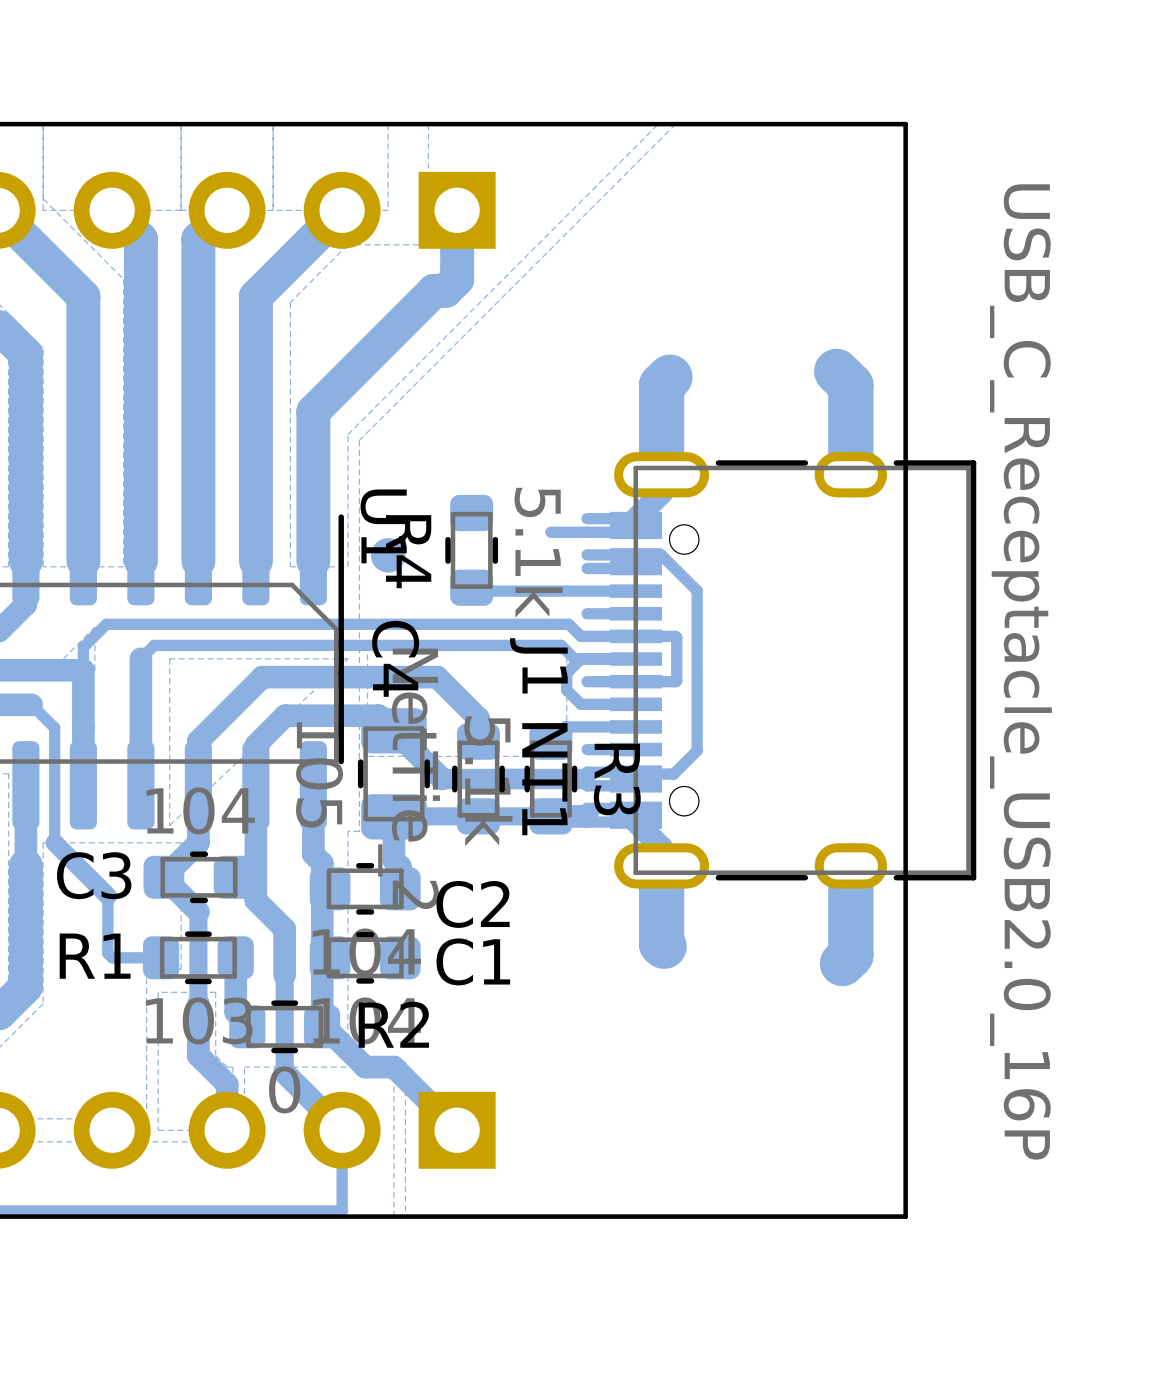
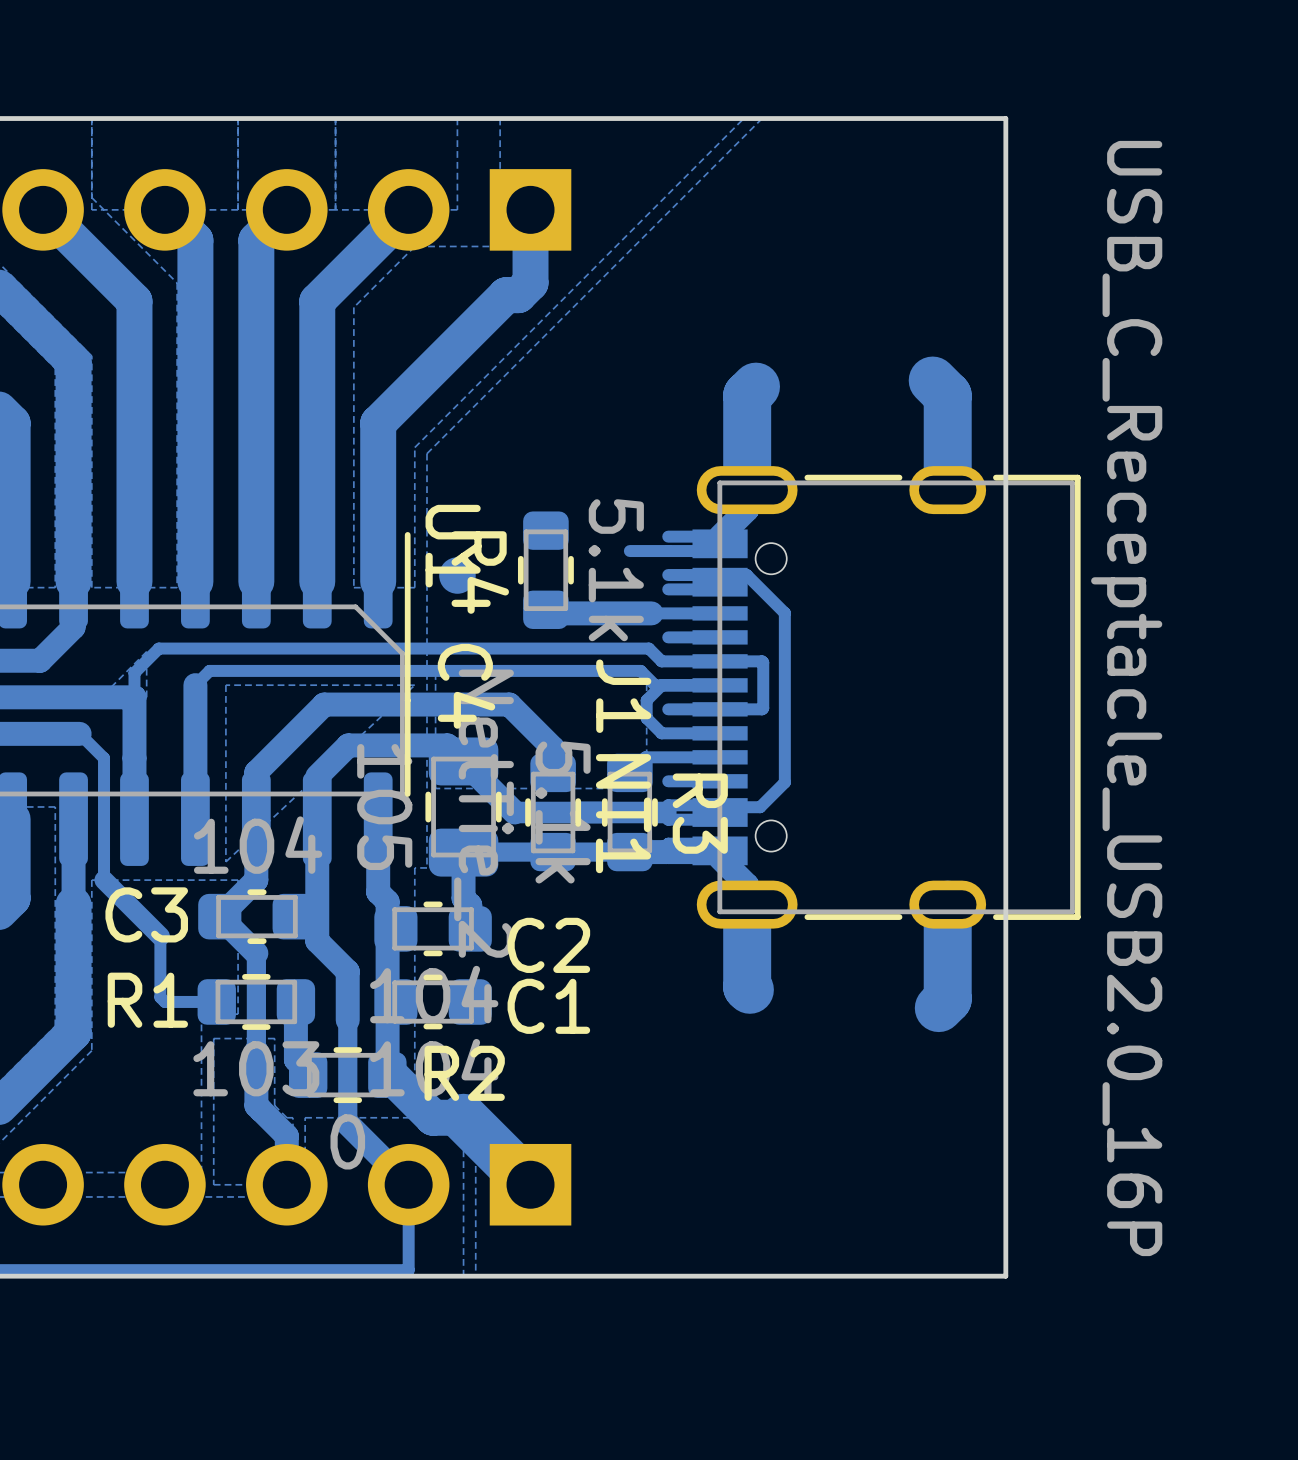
bottom track width: thin (571, 591) (475, 591) -> thick (651, 613) (549, 613)
bottom track width: thin (322, 1024) (365, 1067) (393, 1067) (457, 1130) -> thick (387, 1072) (433, 1117) (463, 1117) (530, 1184)

